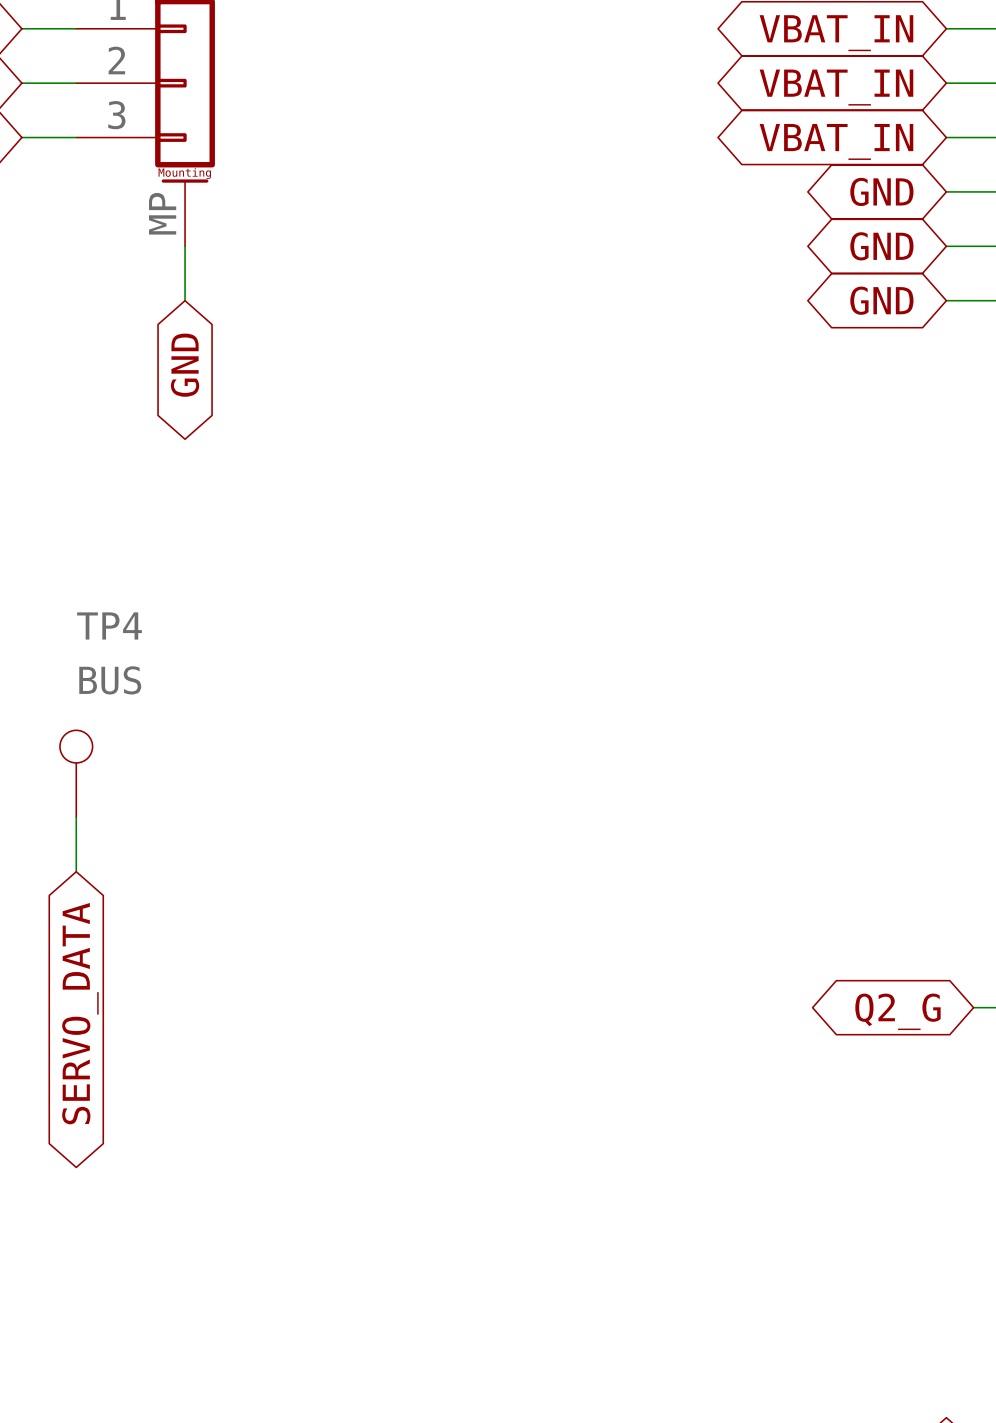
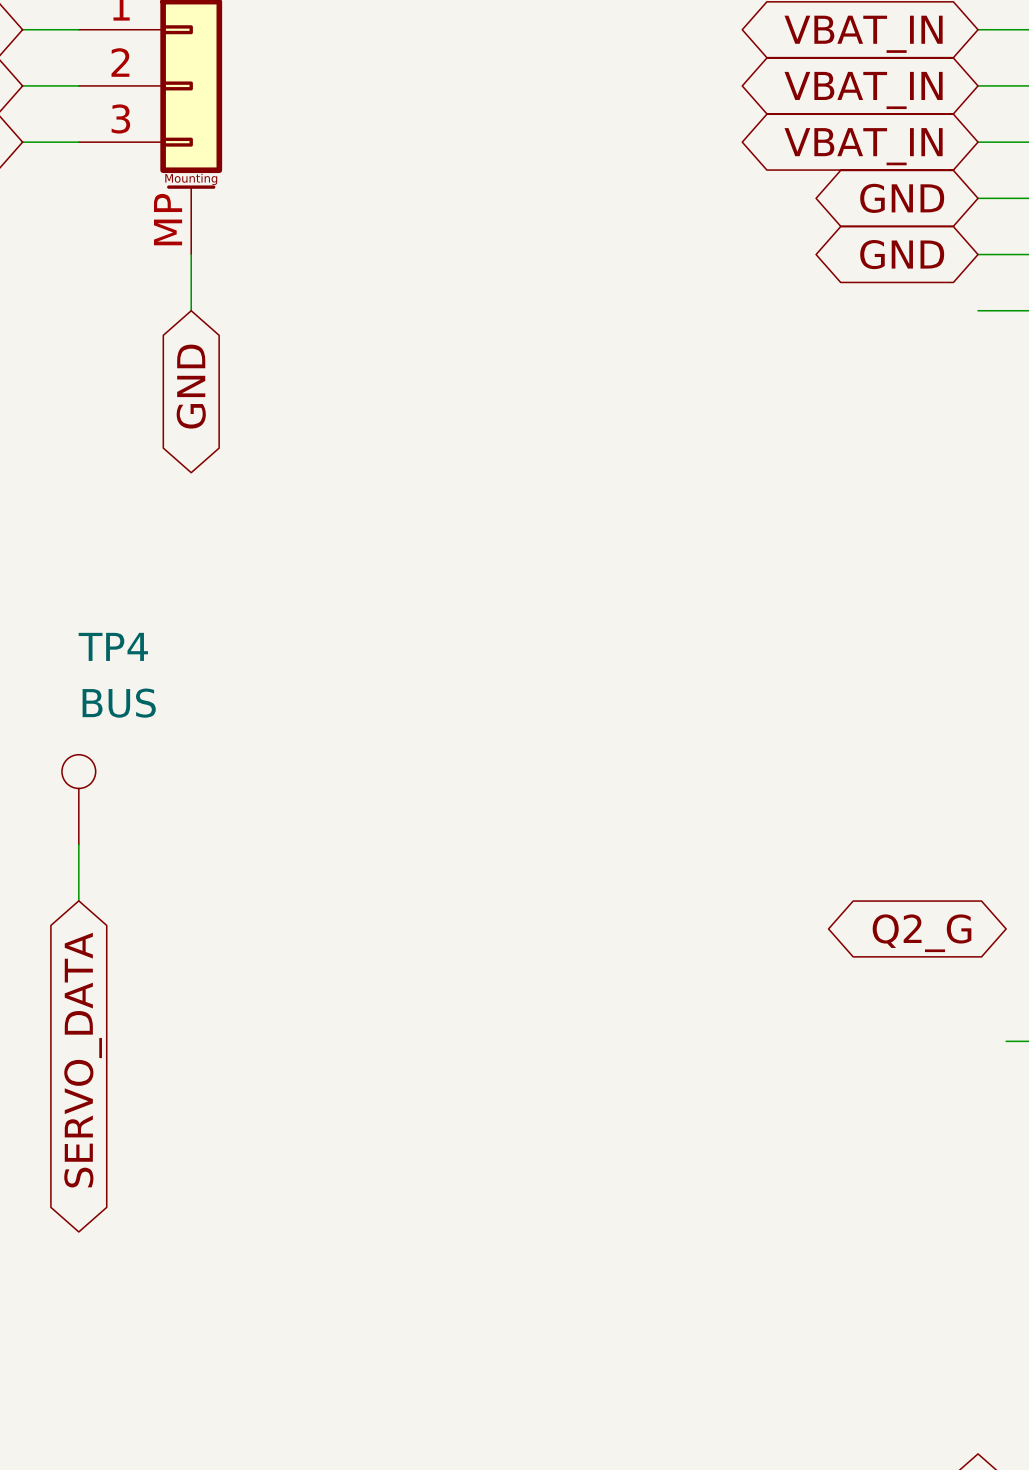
global label: GND (881, 300) -> none
global label position: Q2_G (897, 1011) -> Q2_G (922, 933)

